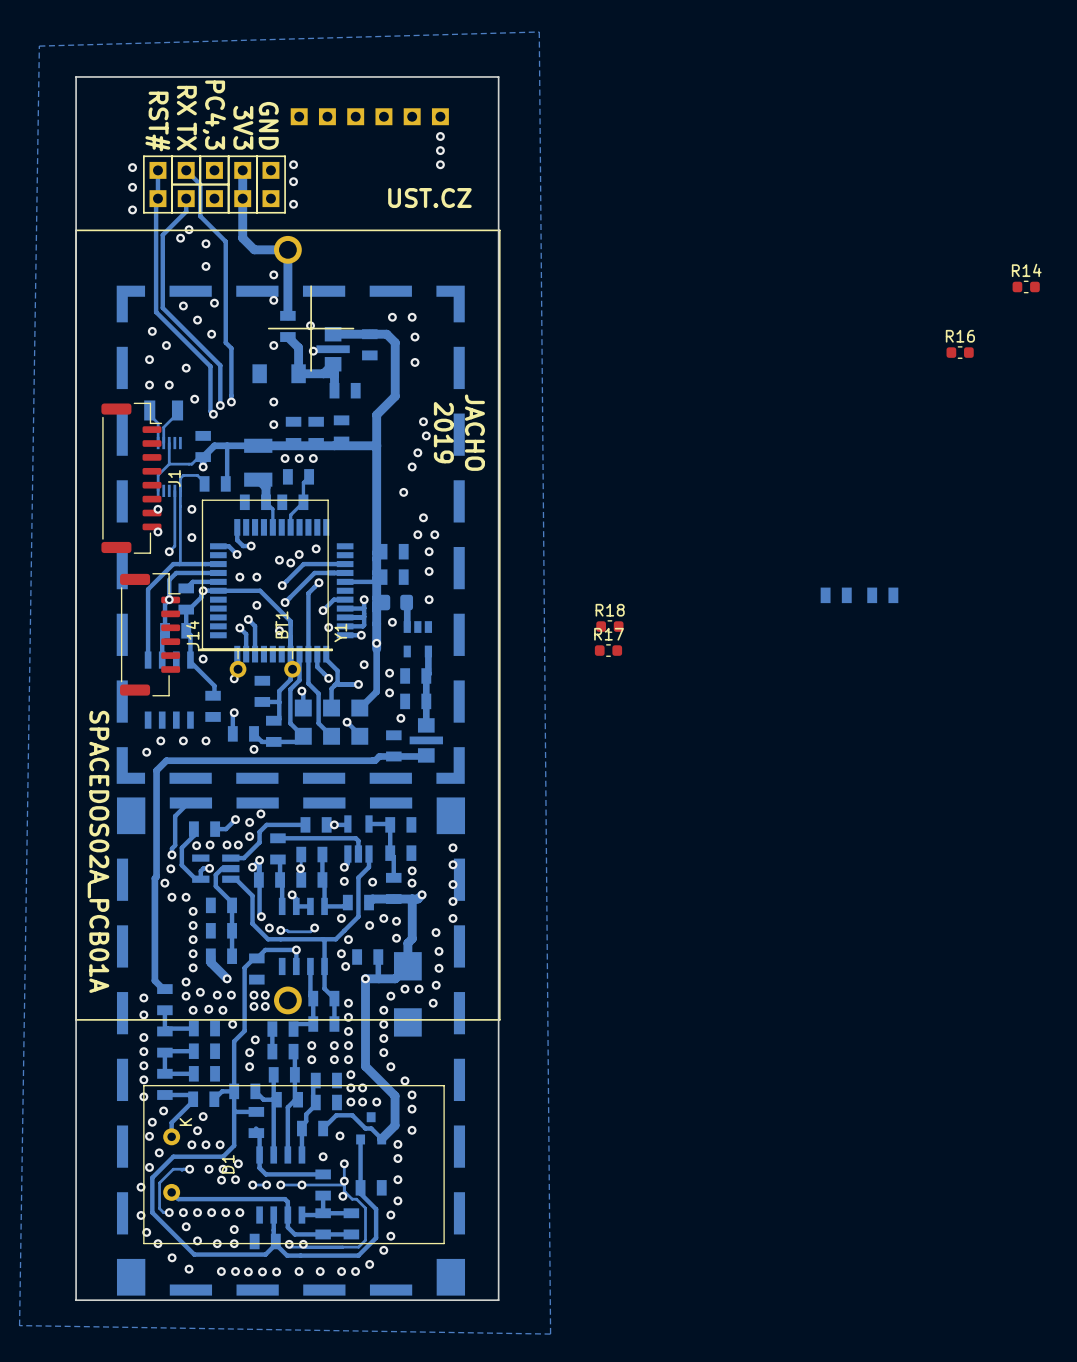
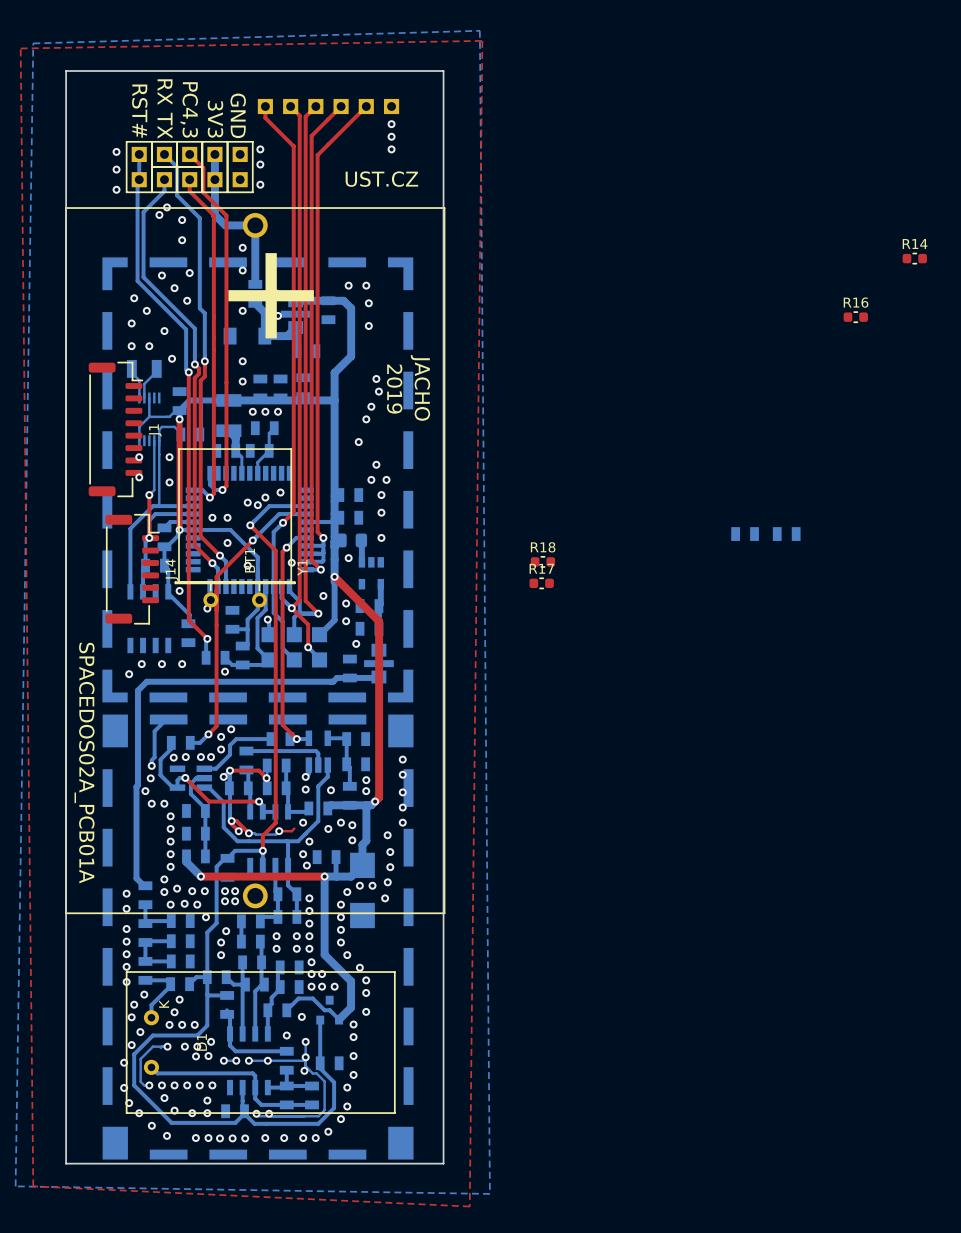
top zone outline: none -> (482, 40) (20, 48) (33, 1186) (469, 1206) (482, 40)
top track: none -> (265, 106) (265, 118) (293, 146)
top track: none -> (290, 106) (299, 115) (299, 600) (291, 608) (308, 624) (308, 647)
top track: none -> (315, 106) (305, 116) (305, 600) (318, 613)
top track: none -> (341, 106) (311, 135) (311, 560) (320, 569)
top track: none -> (366, 106) (317, 155) (317, 532) (323, 537)
top track: none -> (293, 146) (293, 512) (283, 522)
top track: none -> (189, 154) (203, 168) (203, 192) (226, 215) (226, 486) (222, 490)
top track: none -> (189, 179) (189, 191) (213, 215) (213, 493) (209, 497)
top track: none -> (204, 361) (204, 376) (200, 380) (200, 536) (219, 555)
top track: none -> (194, 365) (198, 368) (198, 373) (194, 378) (194, 545) (212, 563)
top track: none -> (188, 372) (188, 620) (207, 638)
top track: none -> (179, 419) (179, 529)
top track: none -> (149, 495) (149, 537)
top track: none -> (250, 525) (275, 550) (275, 822) (262, 835) (262, 850)
top track: none -> (252, 540) (216, 576) (216, 726) (208, 734)
top track: none -> (286, 547) (282, 551) (282, 724) (296, 739)
top track: none -> (334, 576) (379, 621) (379, 797) (375, 801)
top track: none -> (230, 770) (259, 770) (266, 778)
top track: none -> (185, 777) (209, 801) (259, 801)
top track: none -> (294, 828) (291, 831) (279, 831)
top track: none -> (238, 831) (231, 824) (231, 821) (236, 821) (248, 833)
top track: none -> (200, 876) (324, 876)

